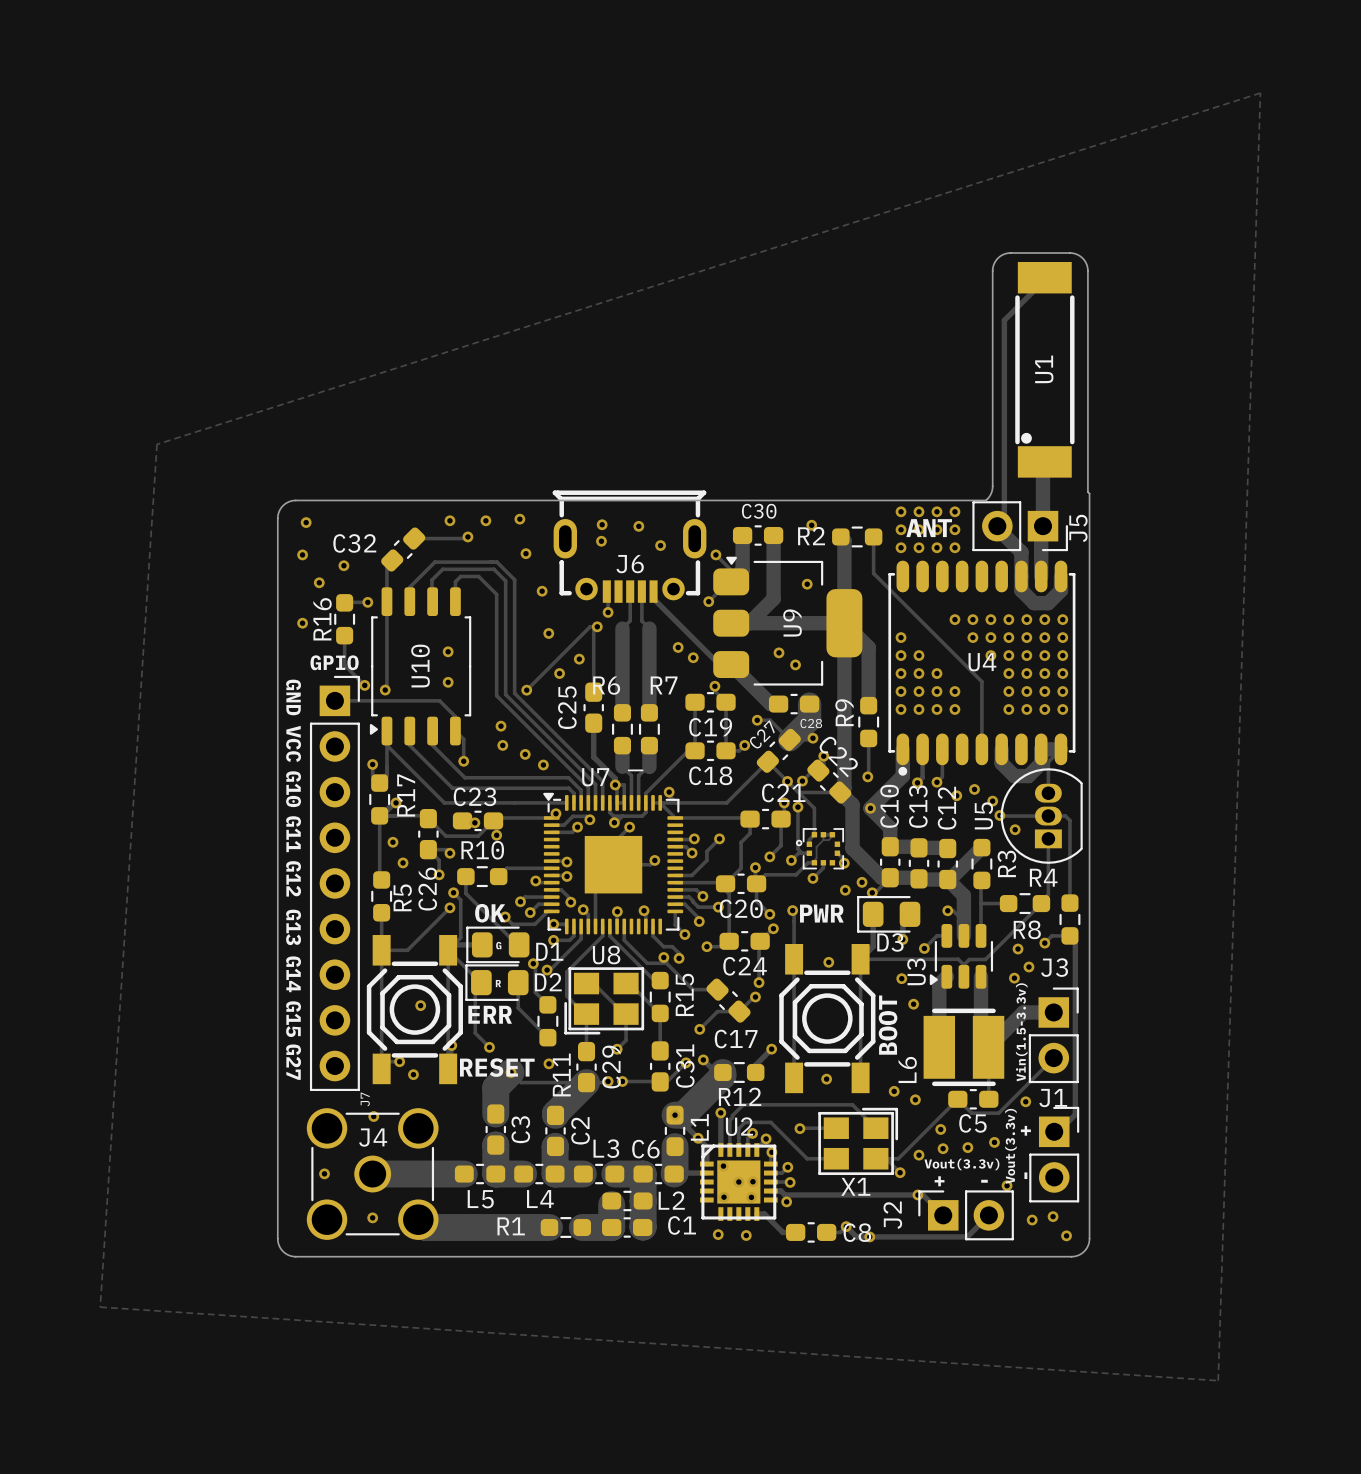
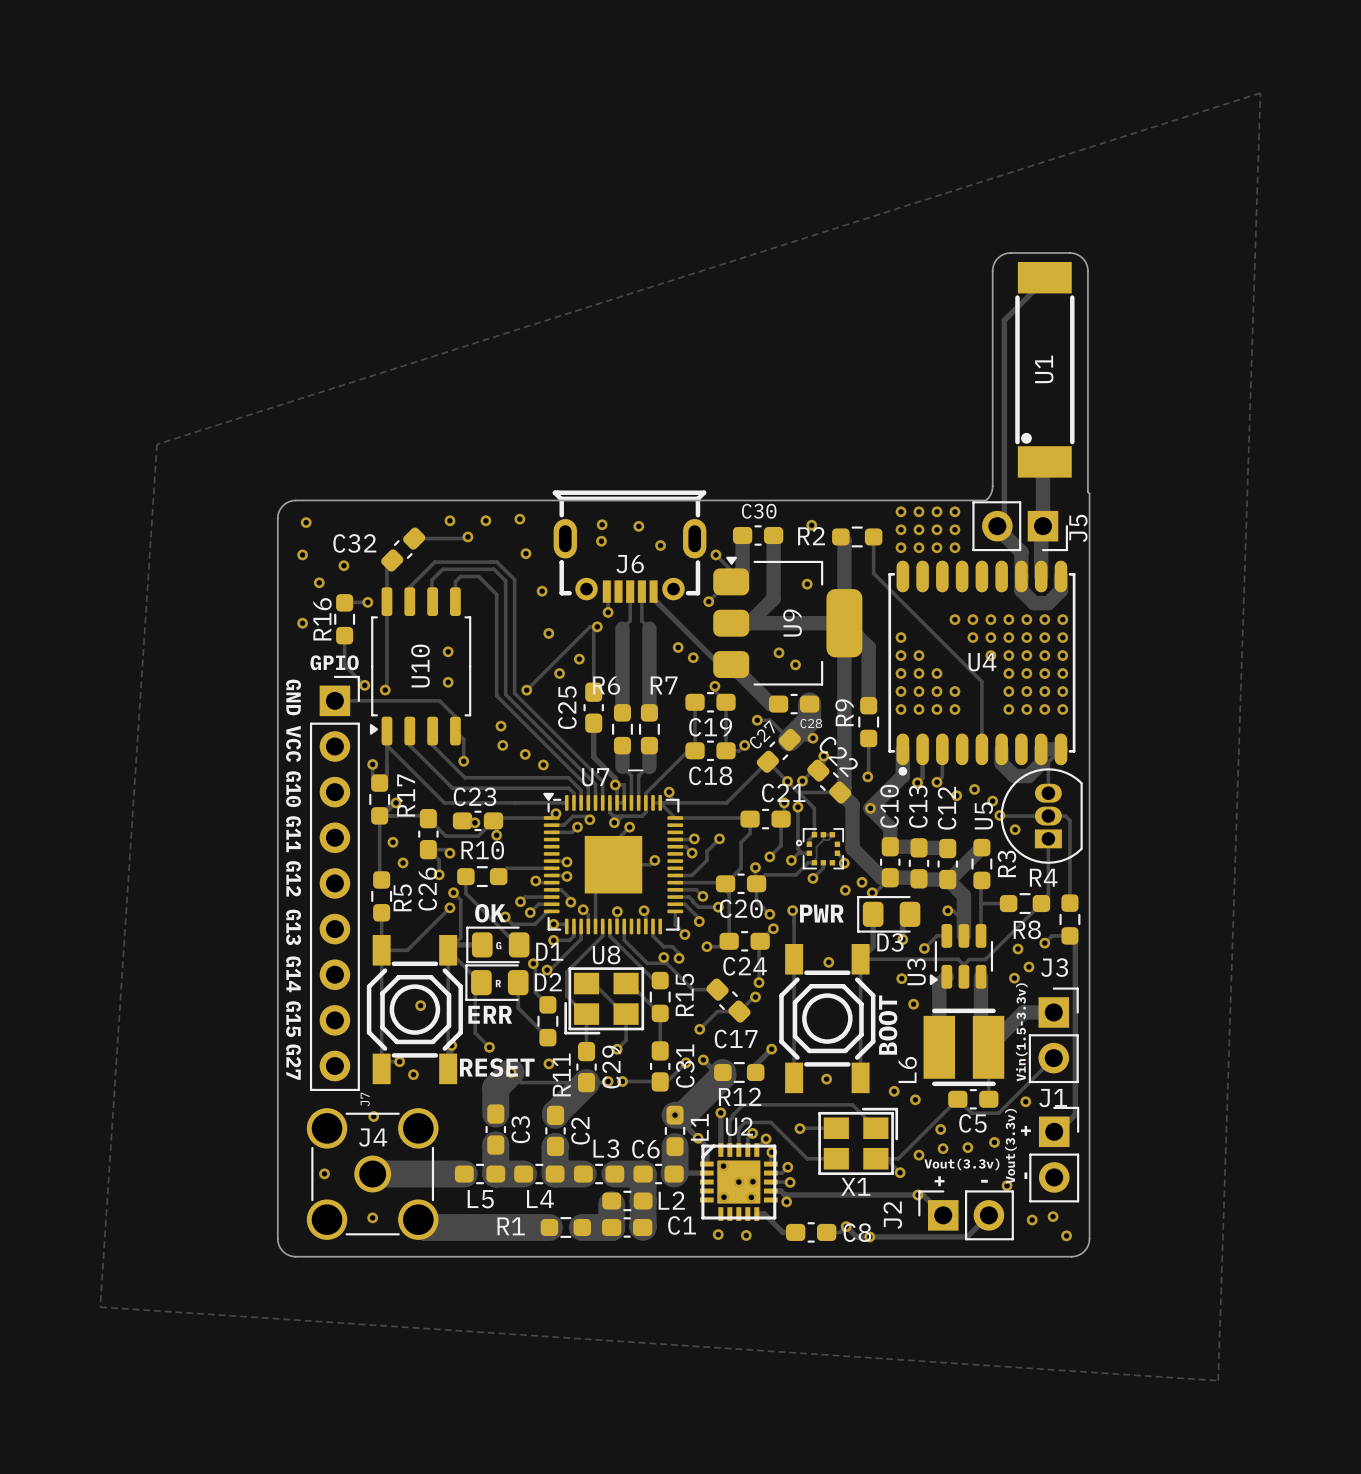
text: ANT (929, 528) -> none

